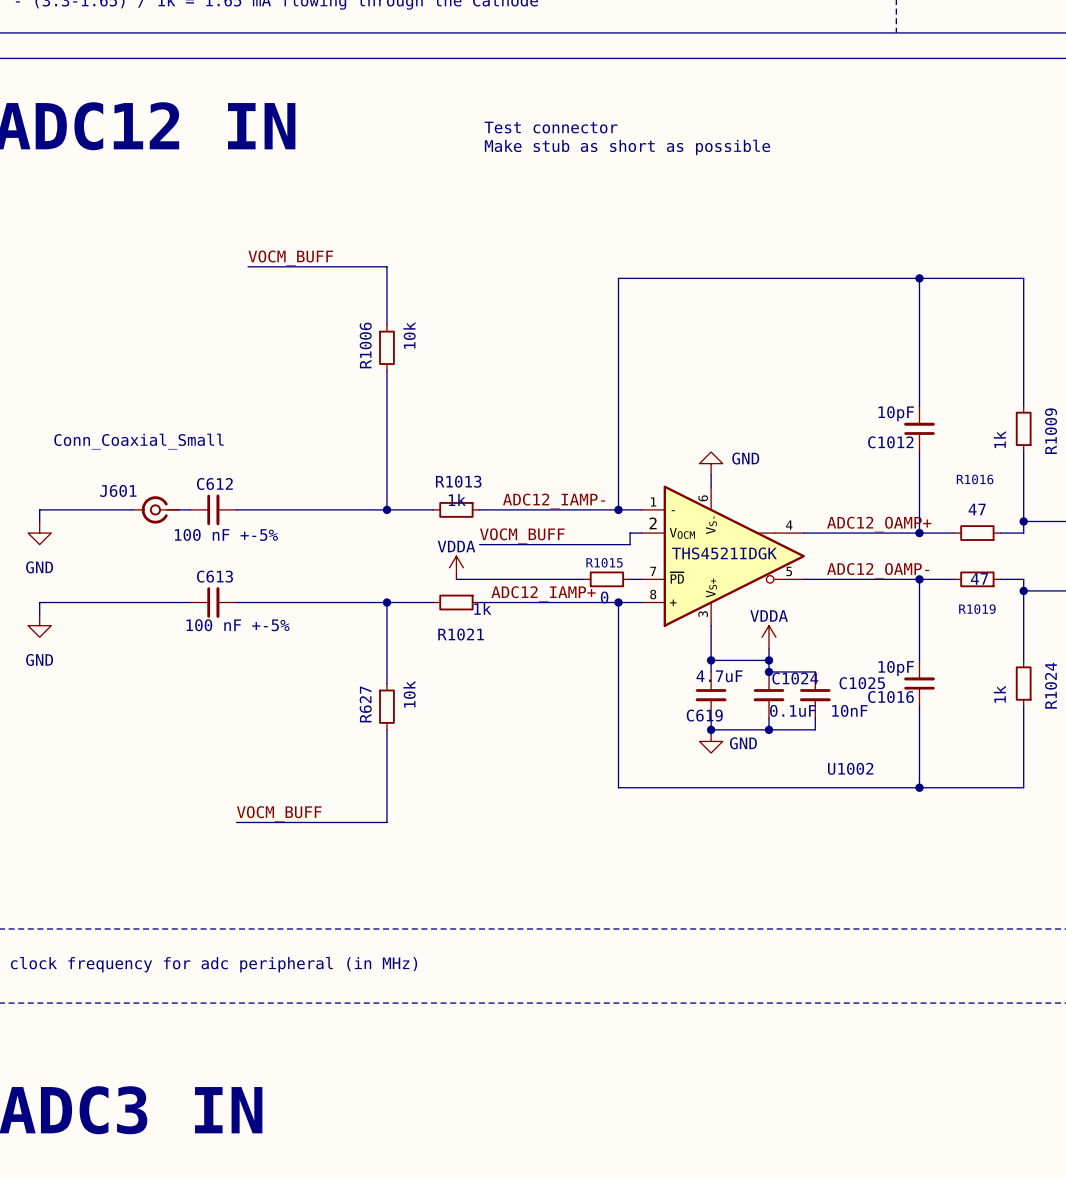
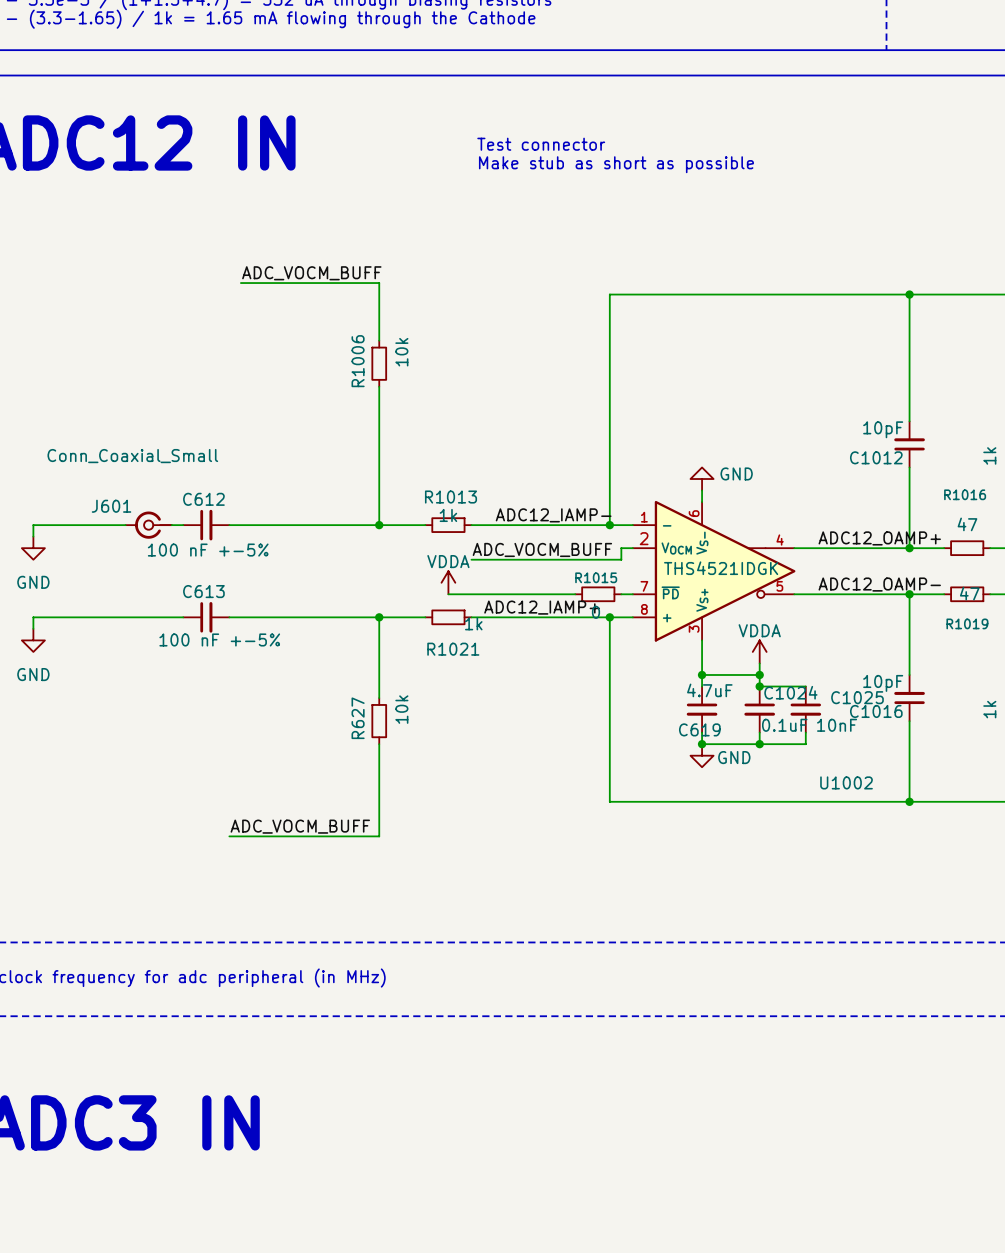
label: VOCM_BUFF (290, 258) -> ADC_VOCM_BUFF (311, 273)
label: VOCM_BUFF (522, 536) -> ADC_VOCM_BUFF (542, 549)
label: VOCM_BUFF (279, 813) -> ADC_VOCM_BUFF (300, 826)

